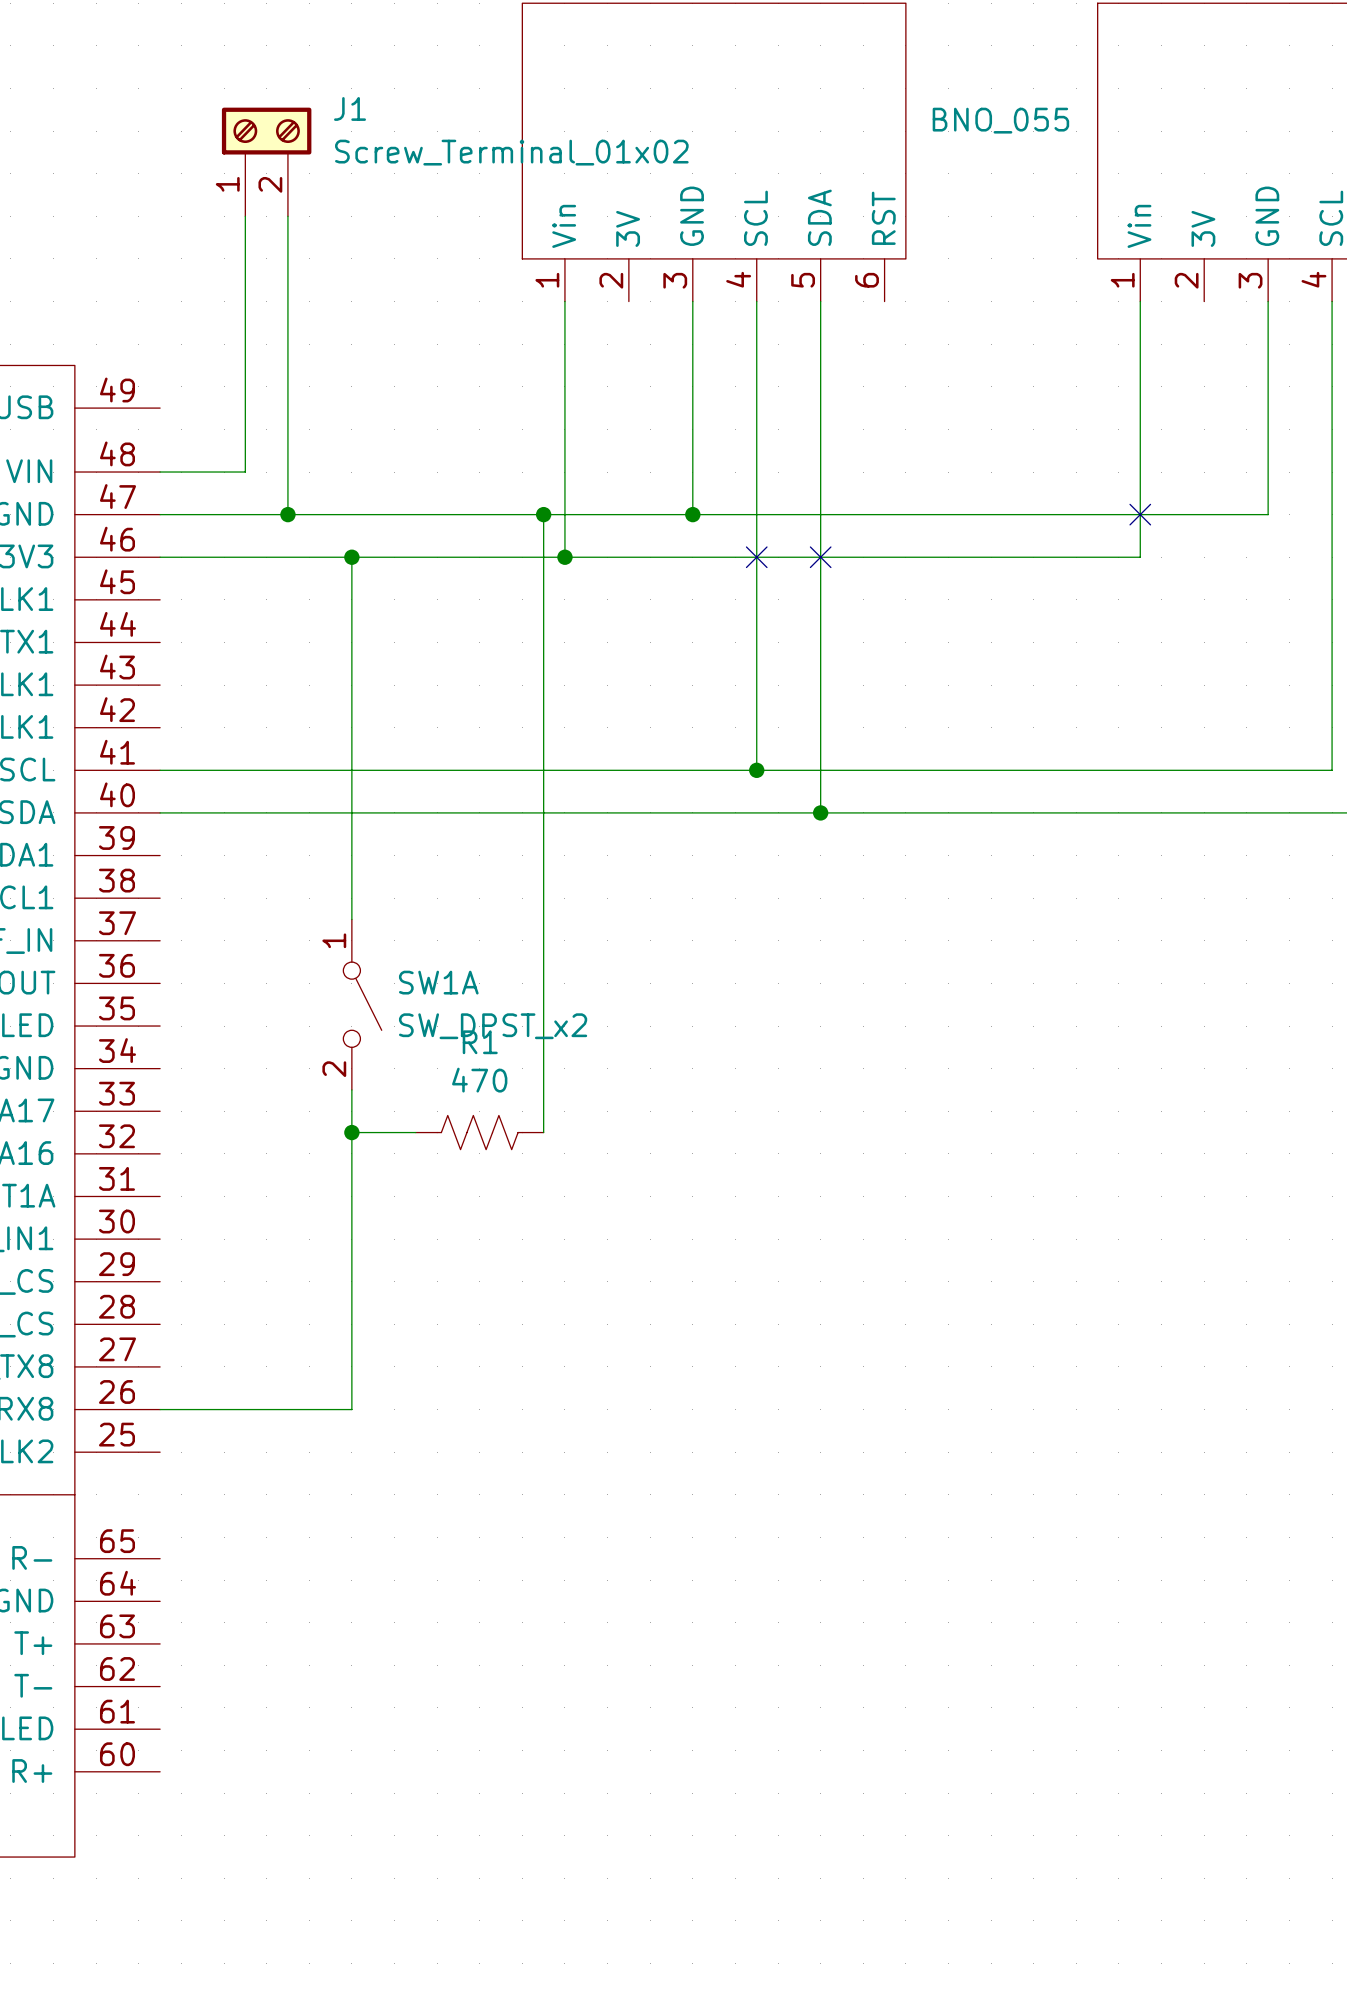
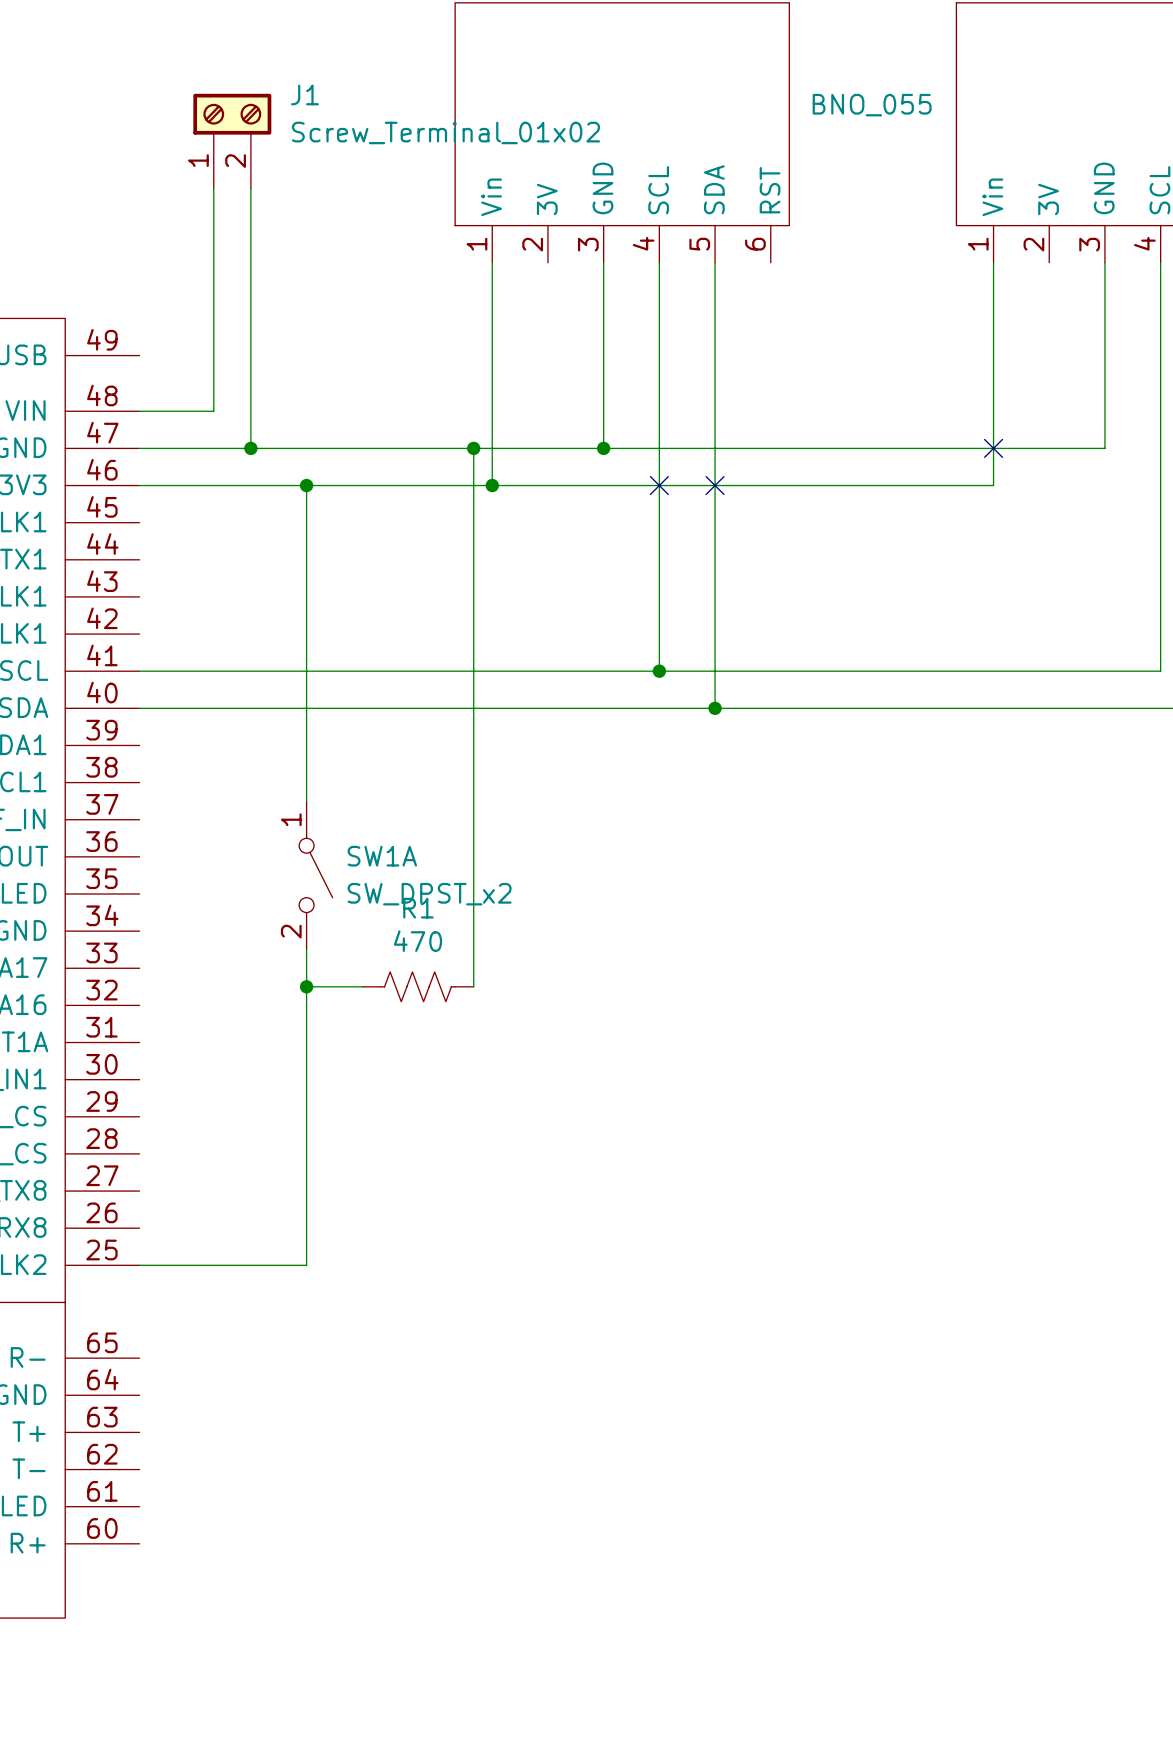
wire: (160, 1409) (351, 1409) -> (139, 1265) (306, 1265) (306, 1228)

